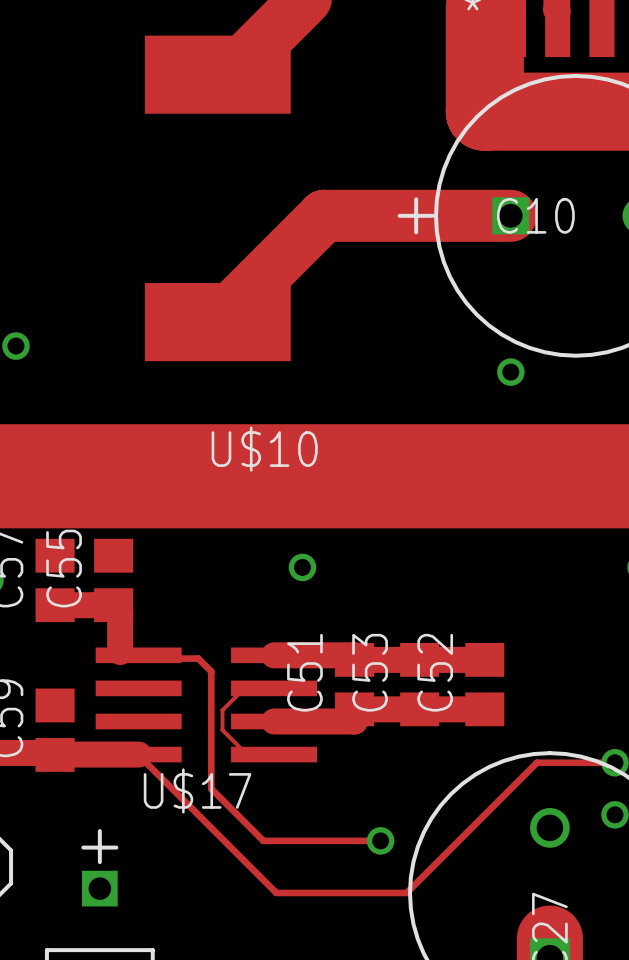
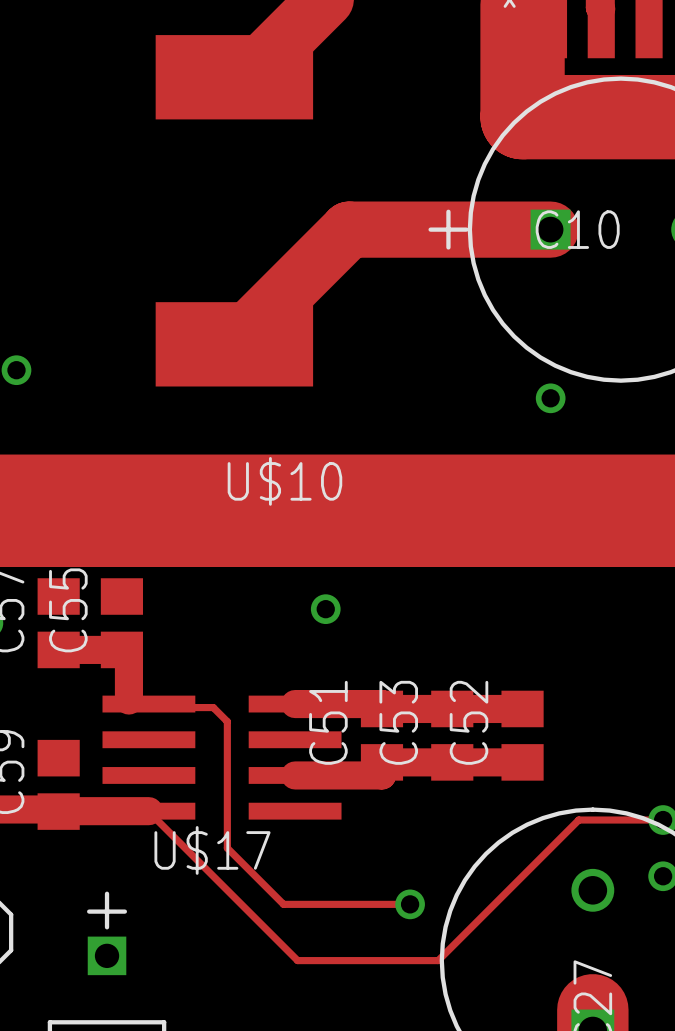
track: (274, 688) (274, 690) (242, 690) (222, 710) (222, 730) (246, 753) (274, 754) -> none

